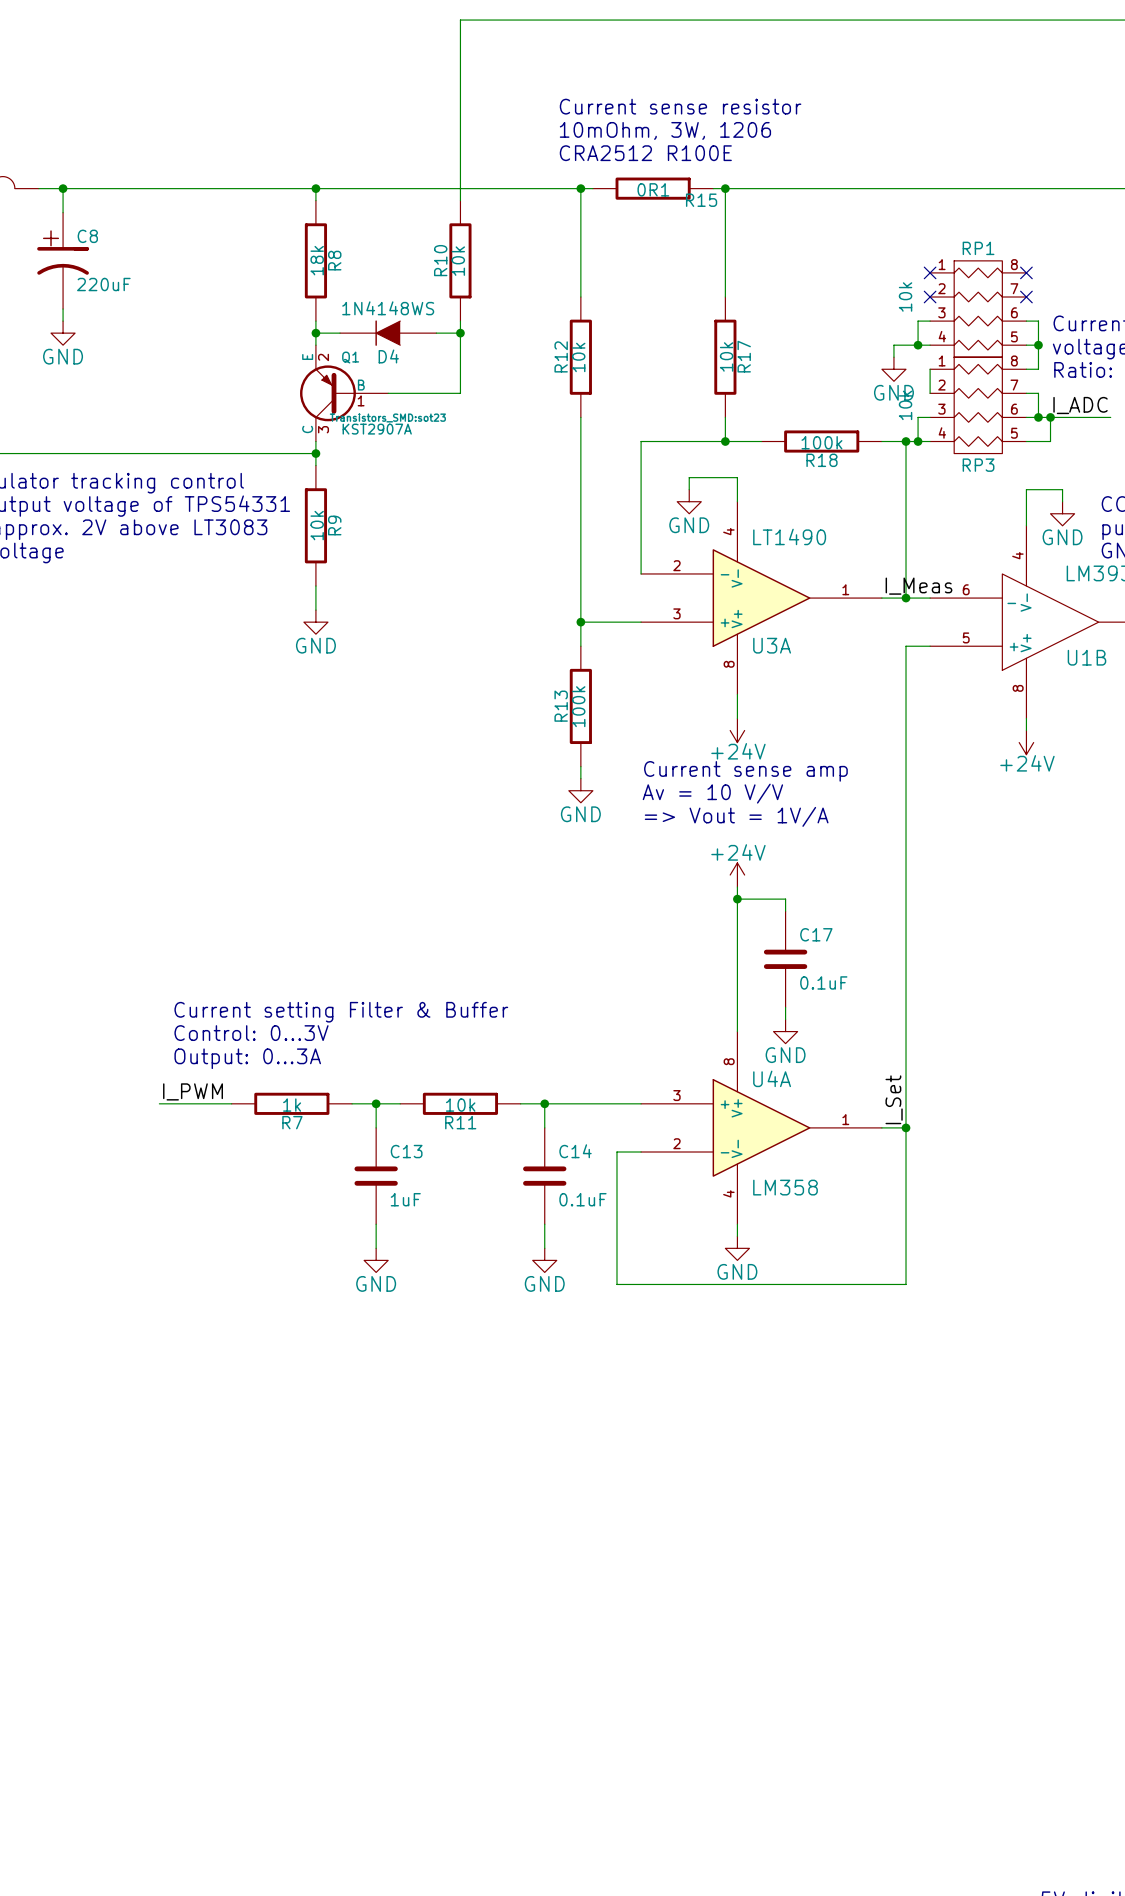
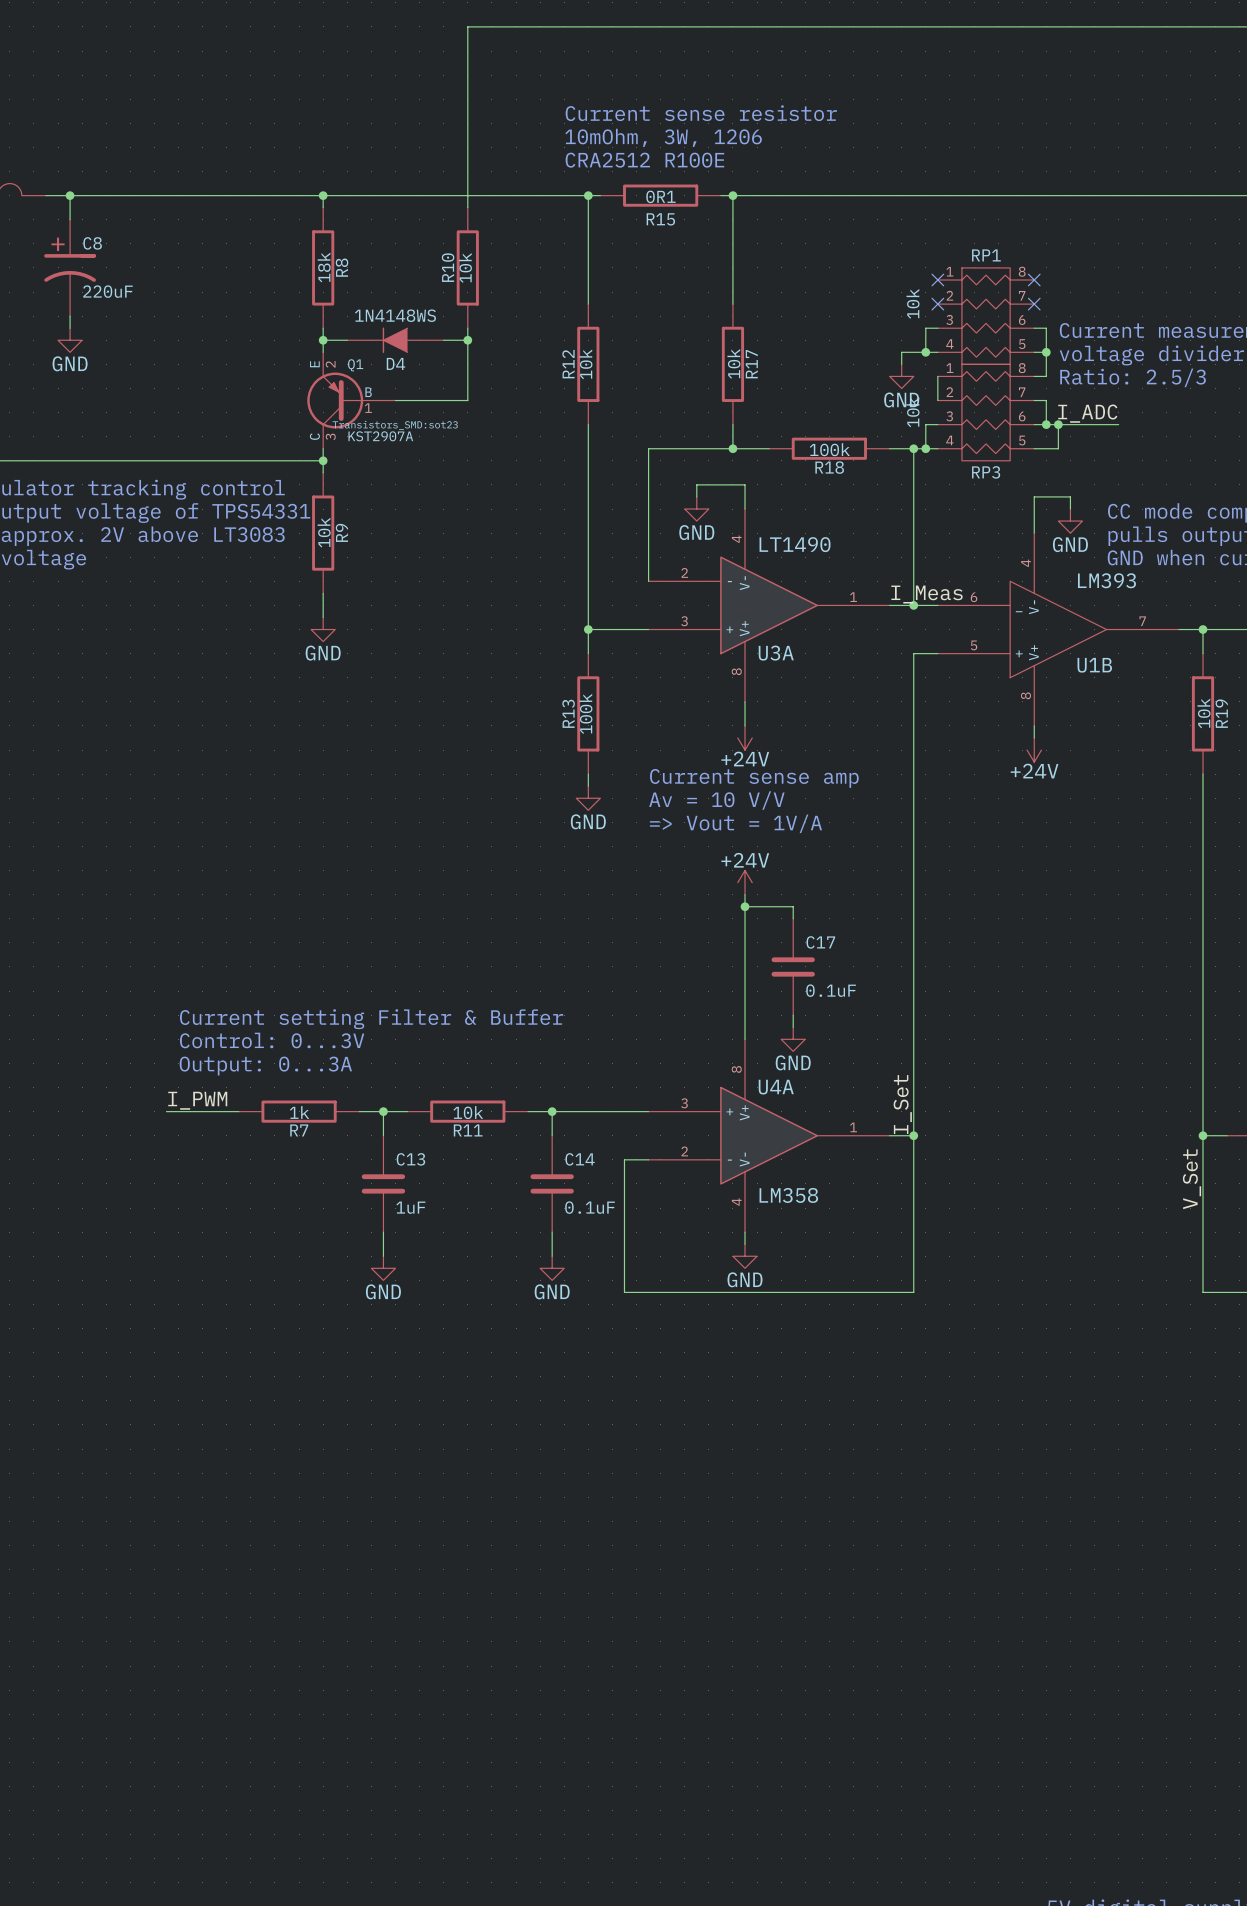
R15 name position: R15 (701, 200) -> R15 (660, 219)

